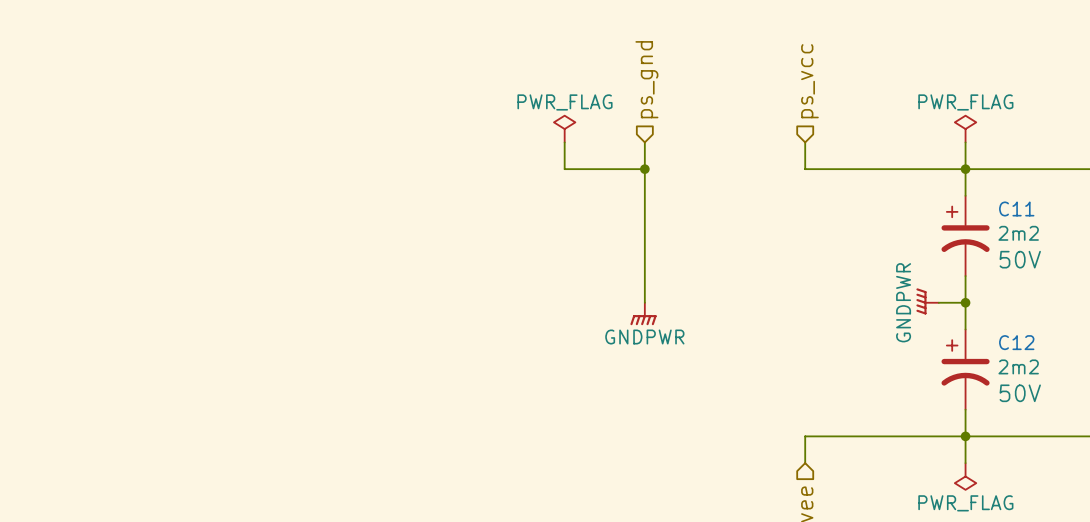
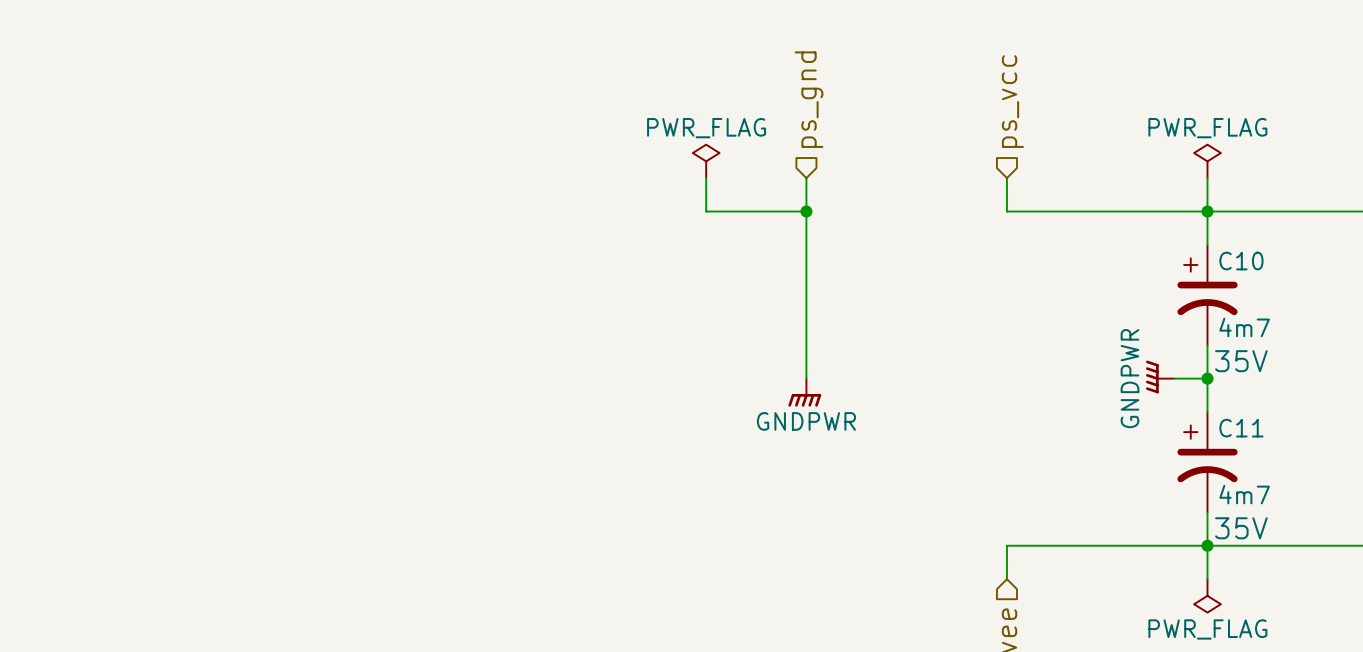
C11 name: C11 (1016, 208) -> C10 (1241, 261)
C11 value: 2m2 (1018, 233) -> 4m7 (1244, 327)
C11 text: 50V (1020, 259) -> 35V (1241, 361)
C12 name: C12 (1016, 342) -> C11 (1241, 428)
C12 value: 2m2 (1018, 366) -> 4m7 (1244, 494)
C12 text: 50V (1020, 393) -> 35V (1241, 528)

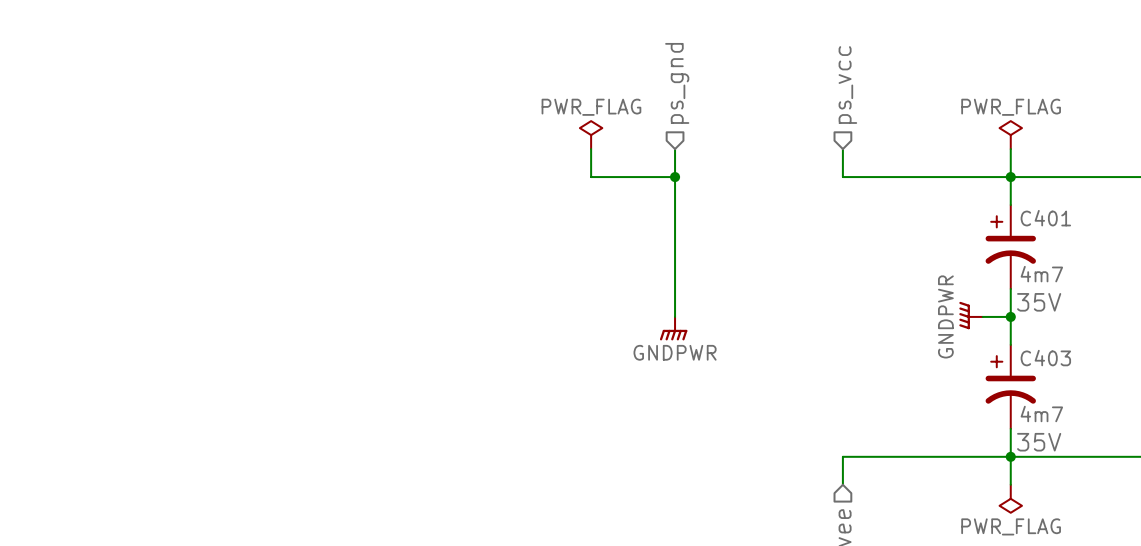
C10 name: C10 (1241, 261) -> C401 (1045, 218)
C11 name: C11 (1241, 428) -> C403 (1045, 358)

